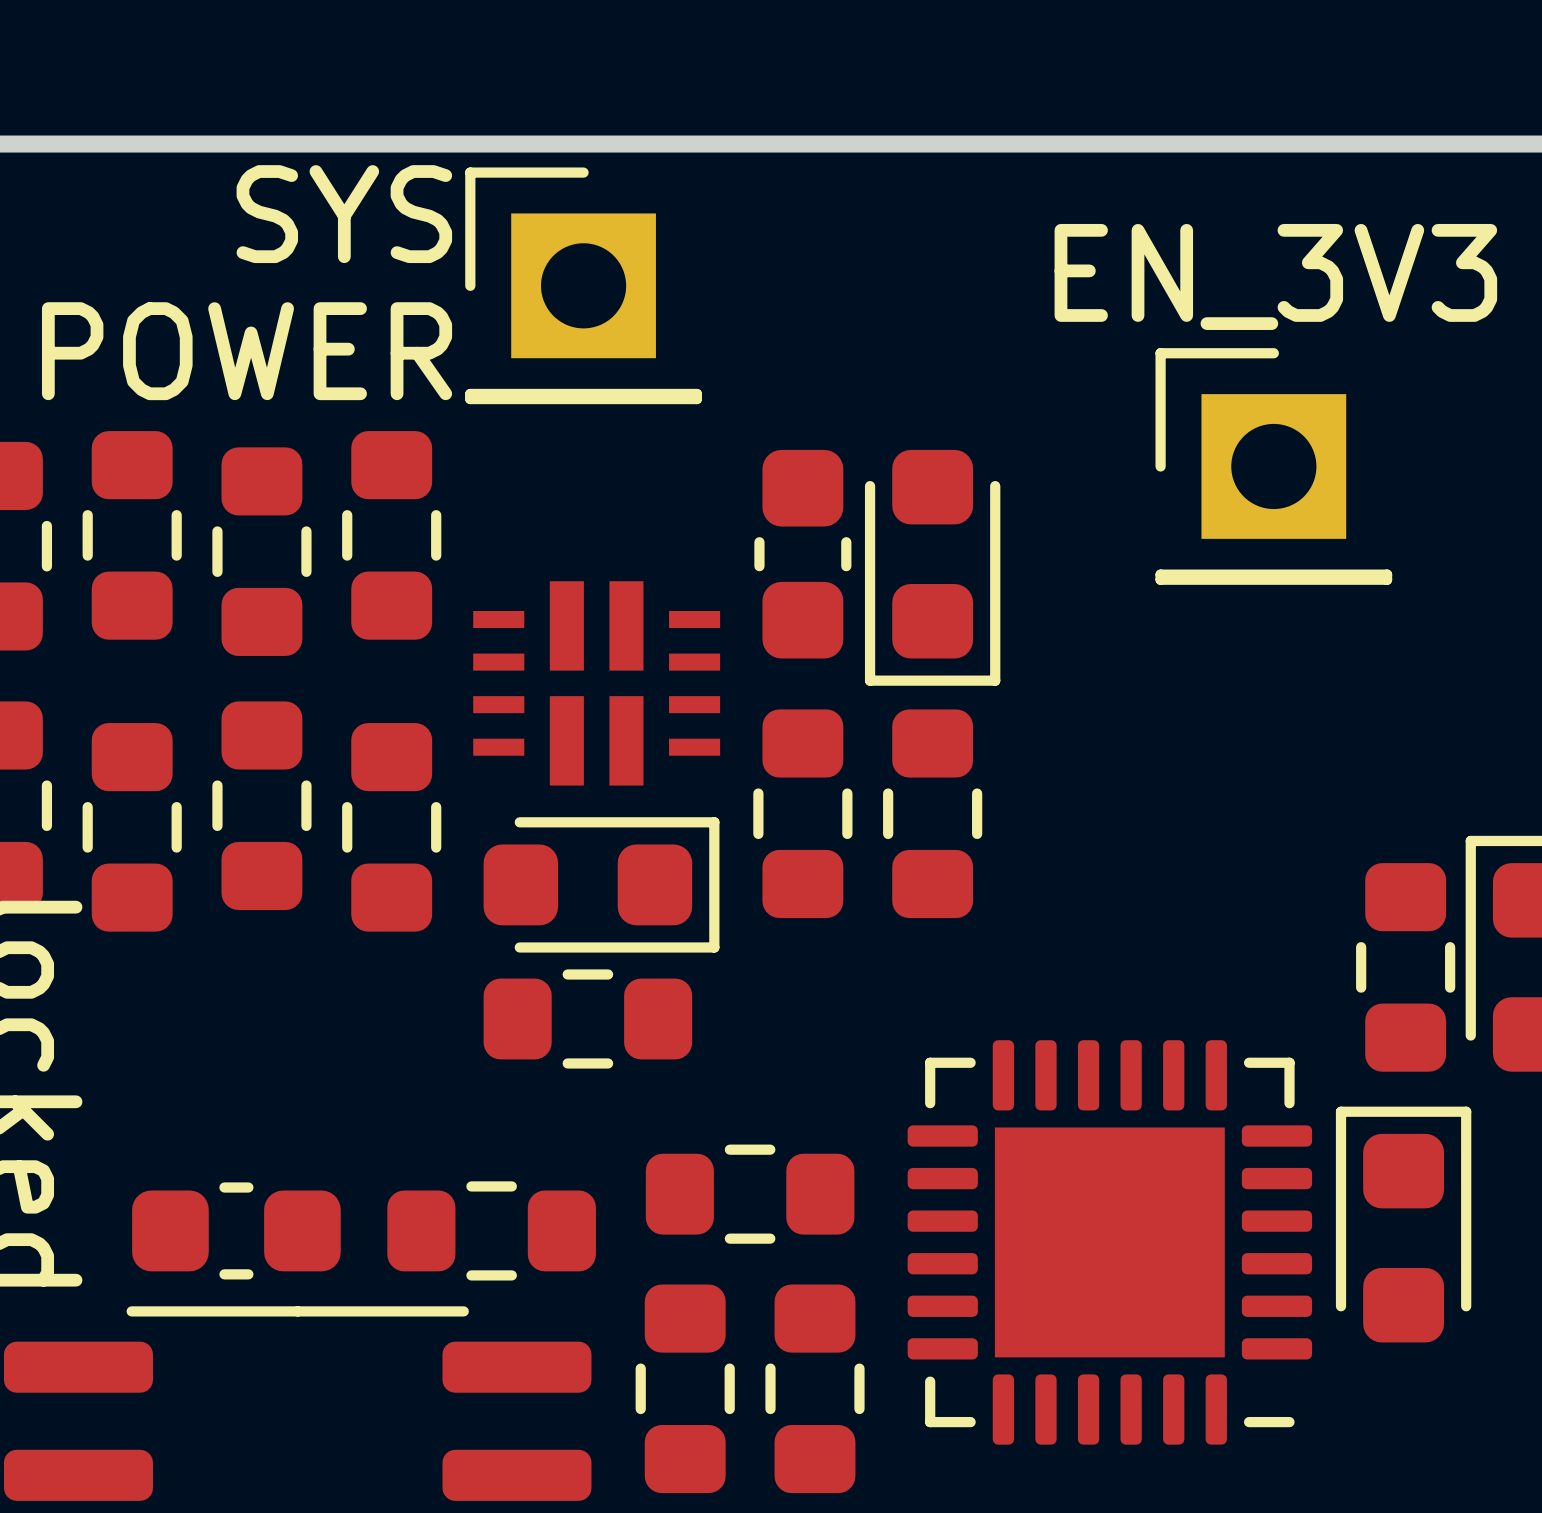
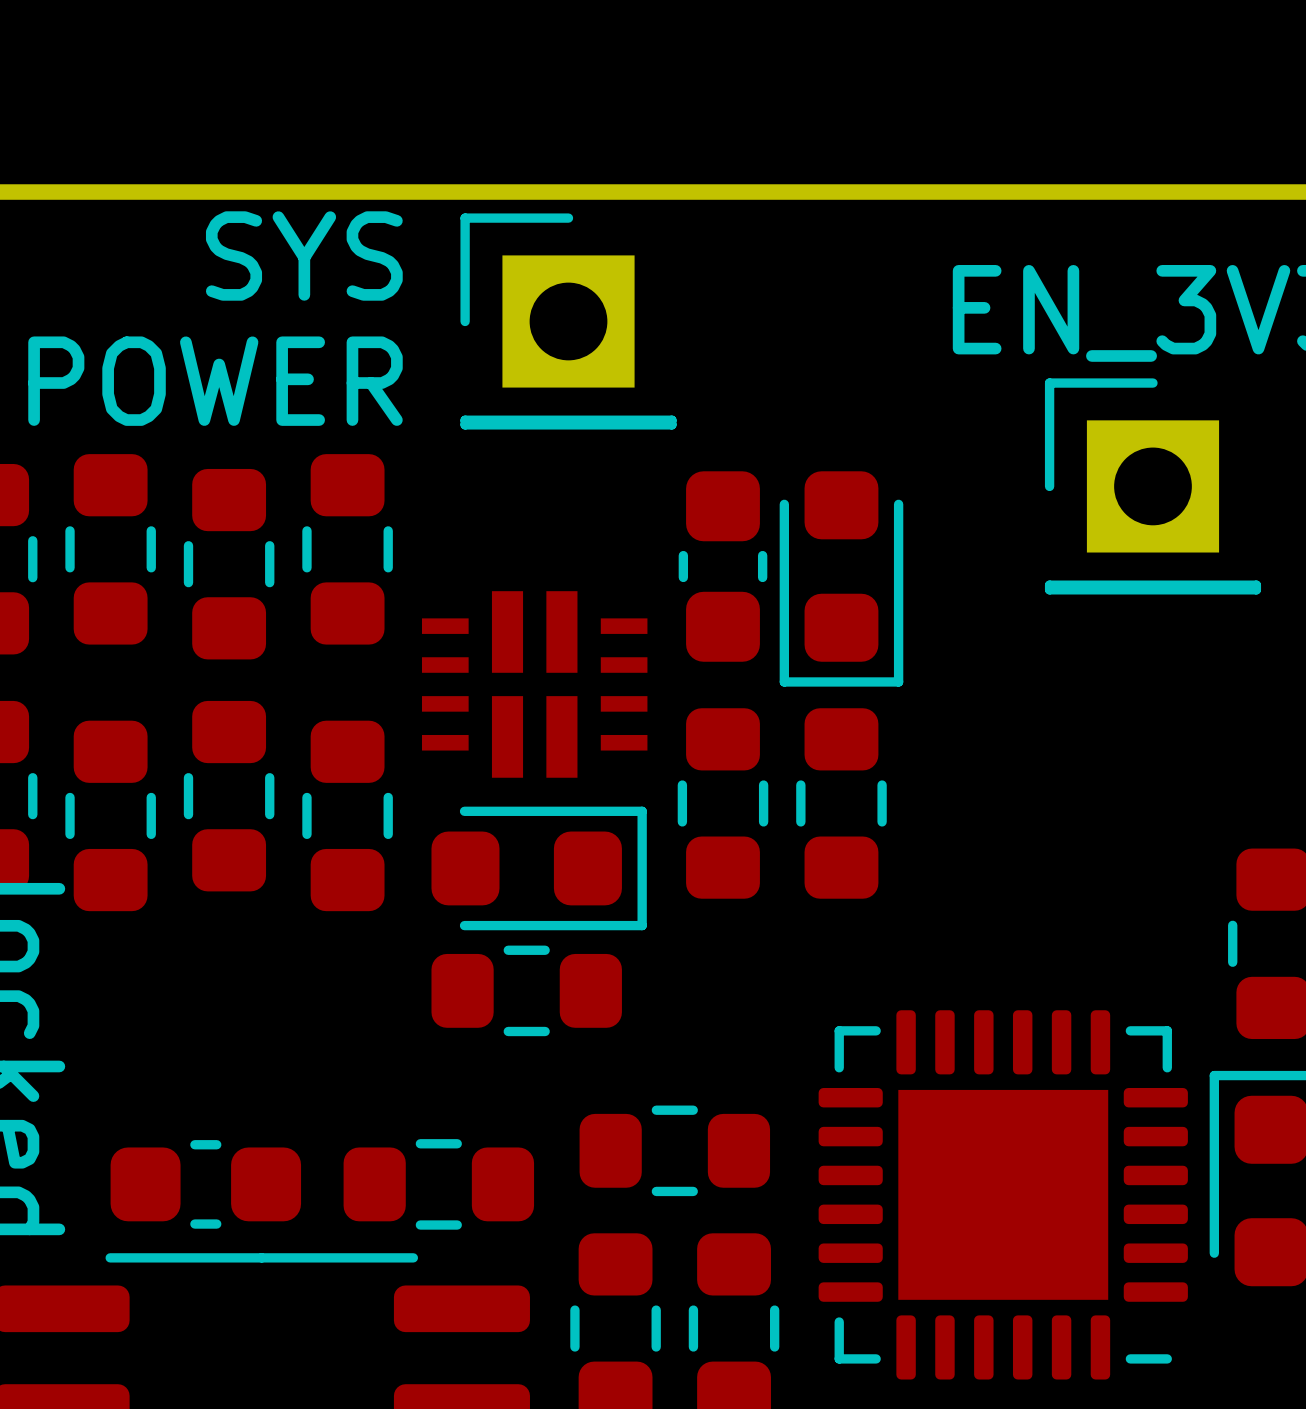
part position: (583, 285) -> (568, 321)

